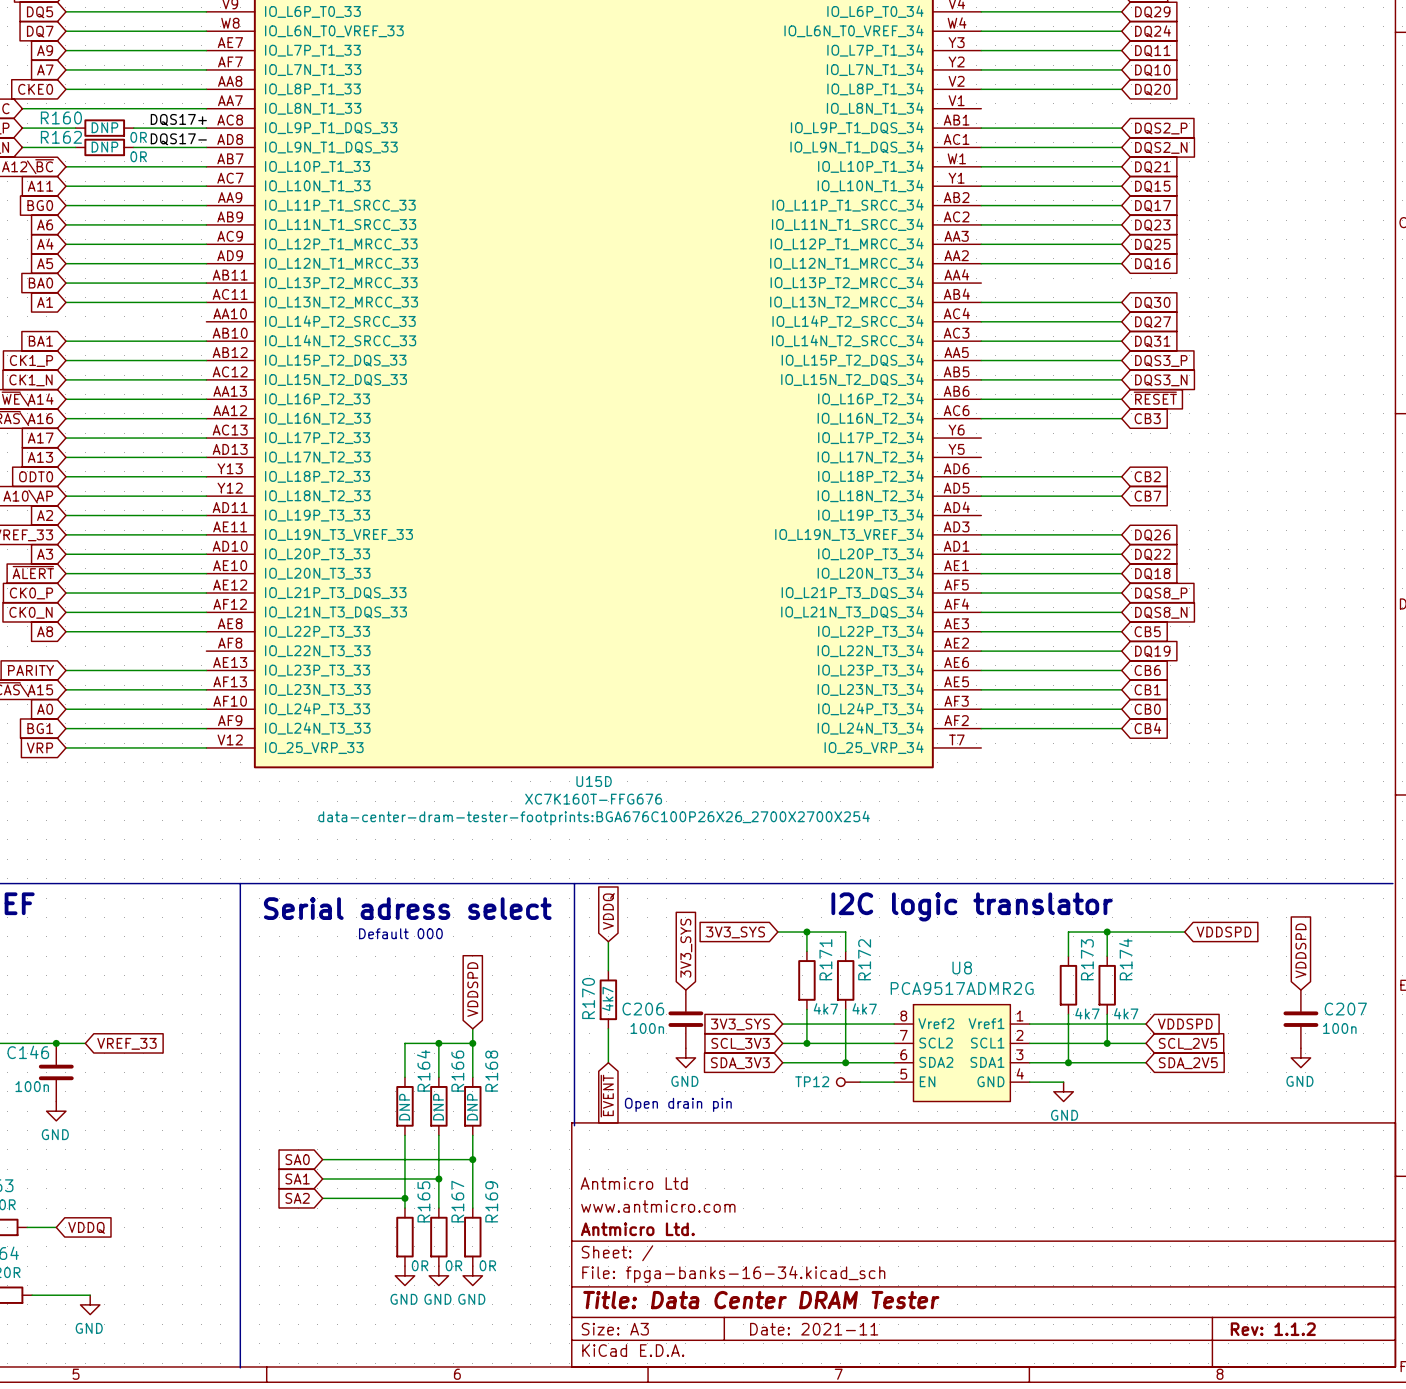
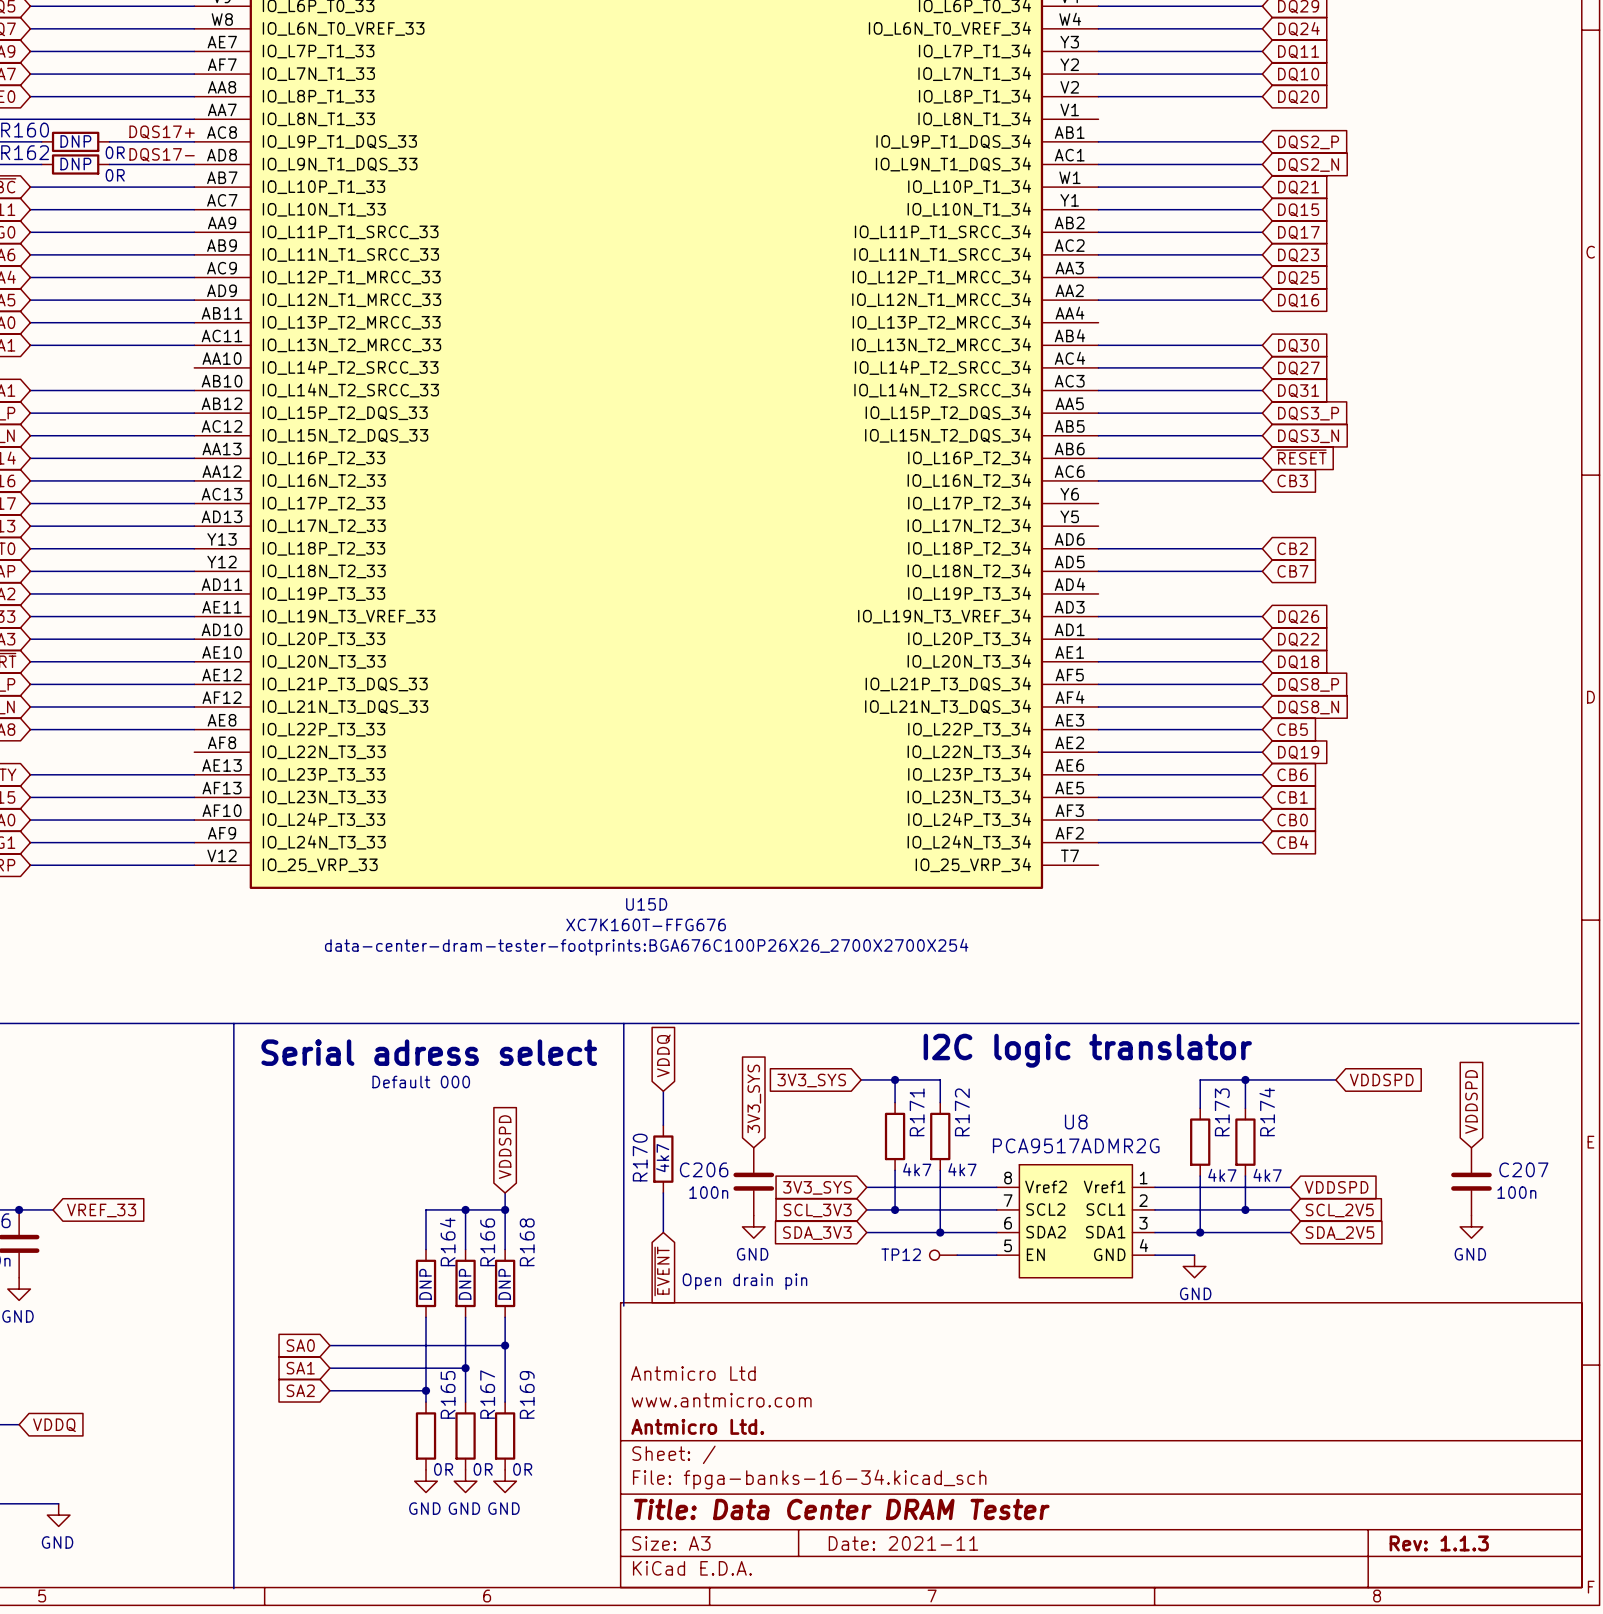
title block: Rev: 1.1.2 (1273, 1329) -> Rev: 1.1.3 (1439, 1543)

